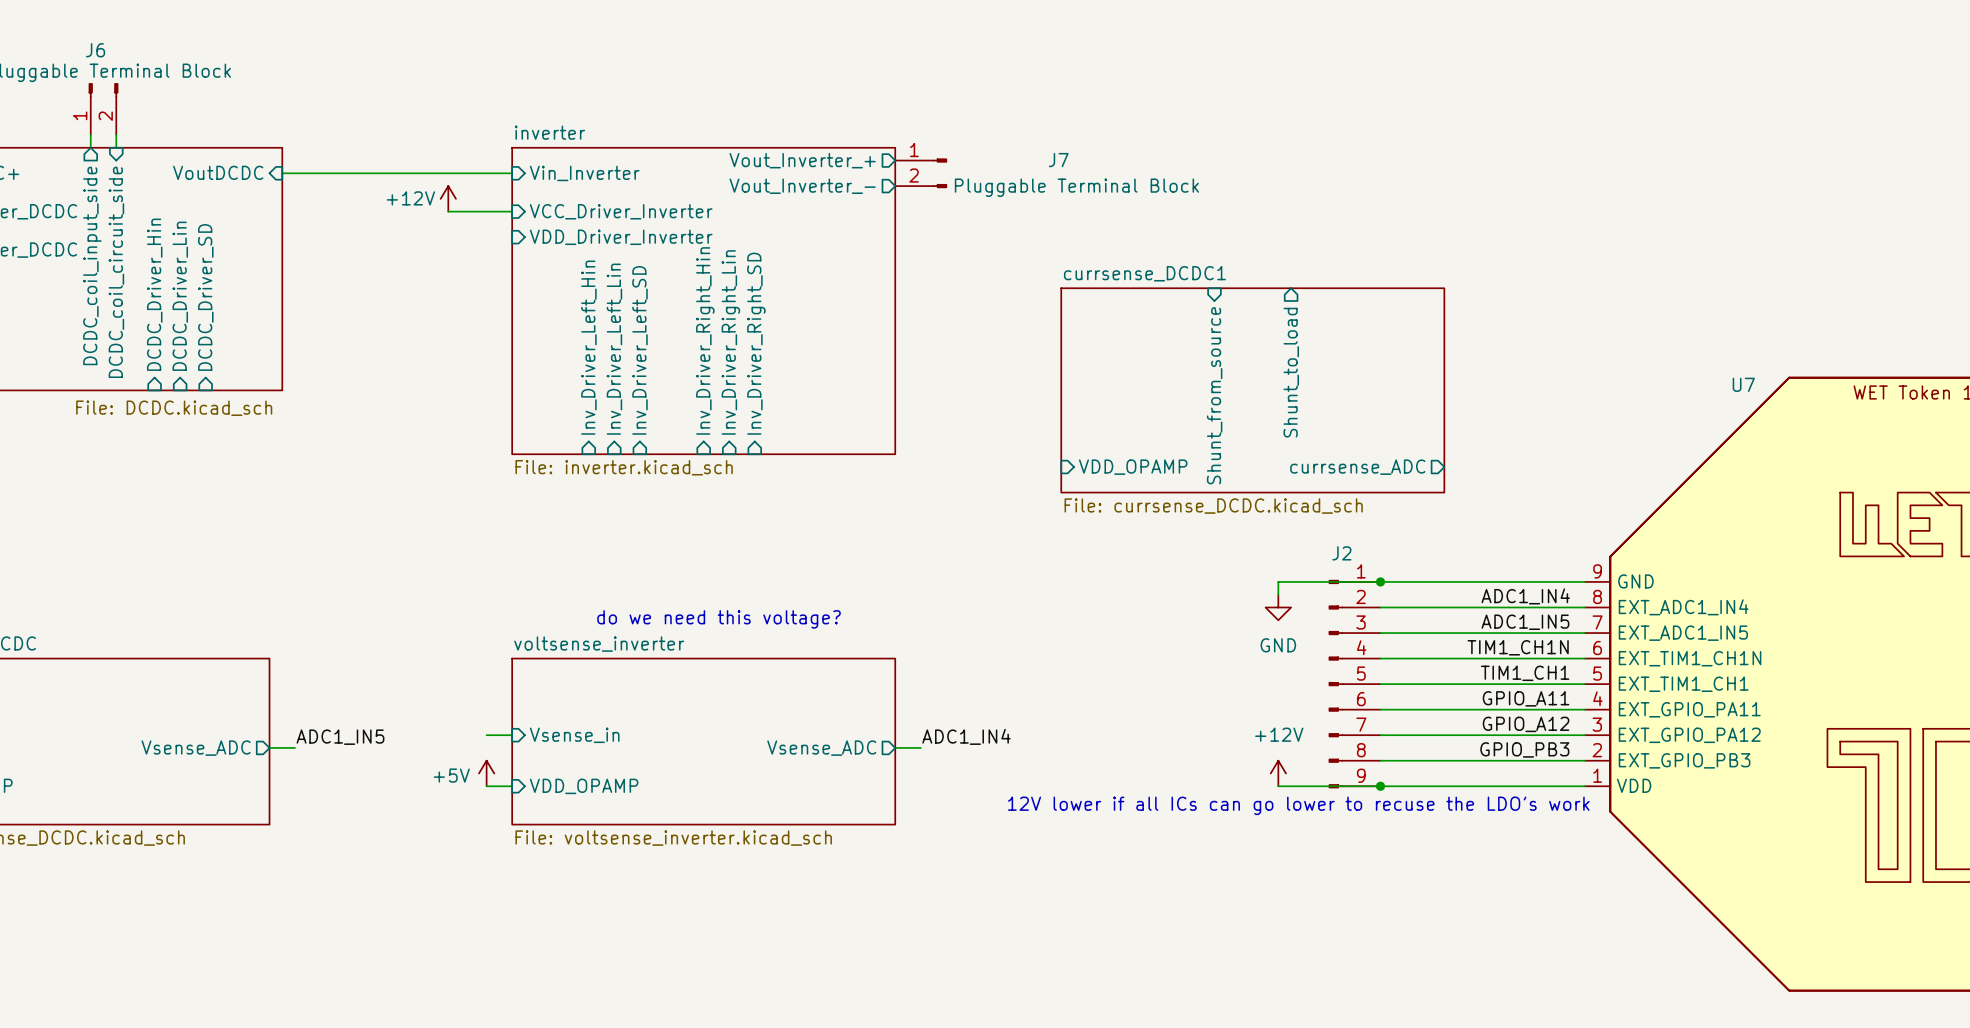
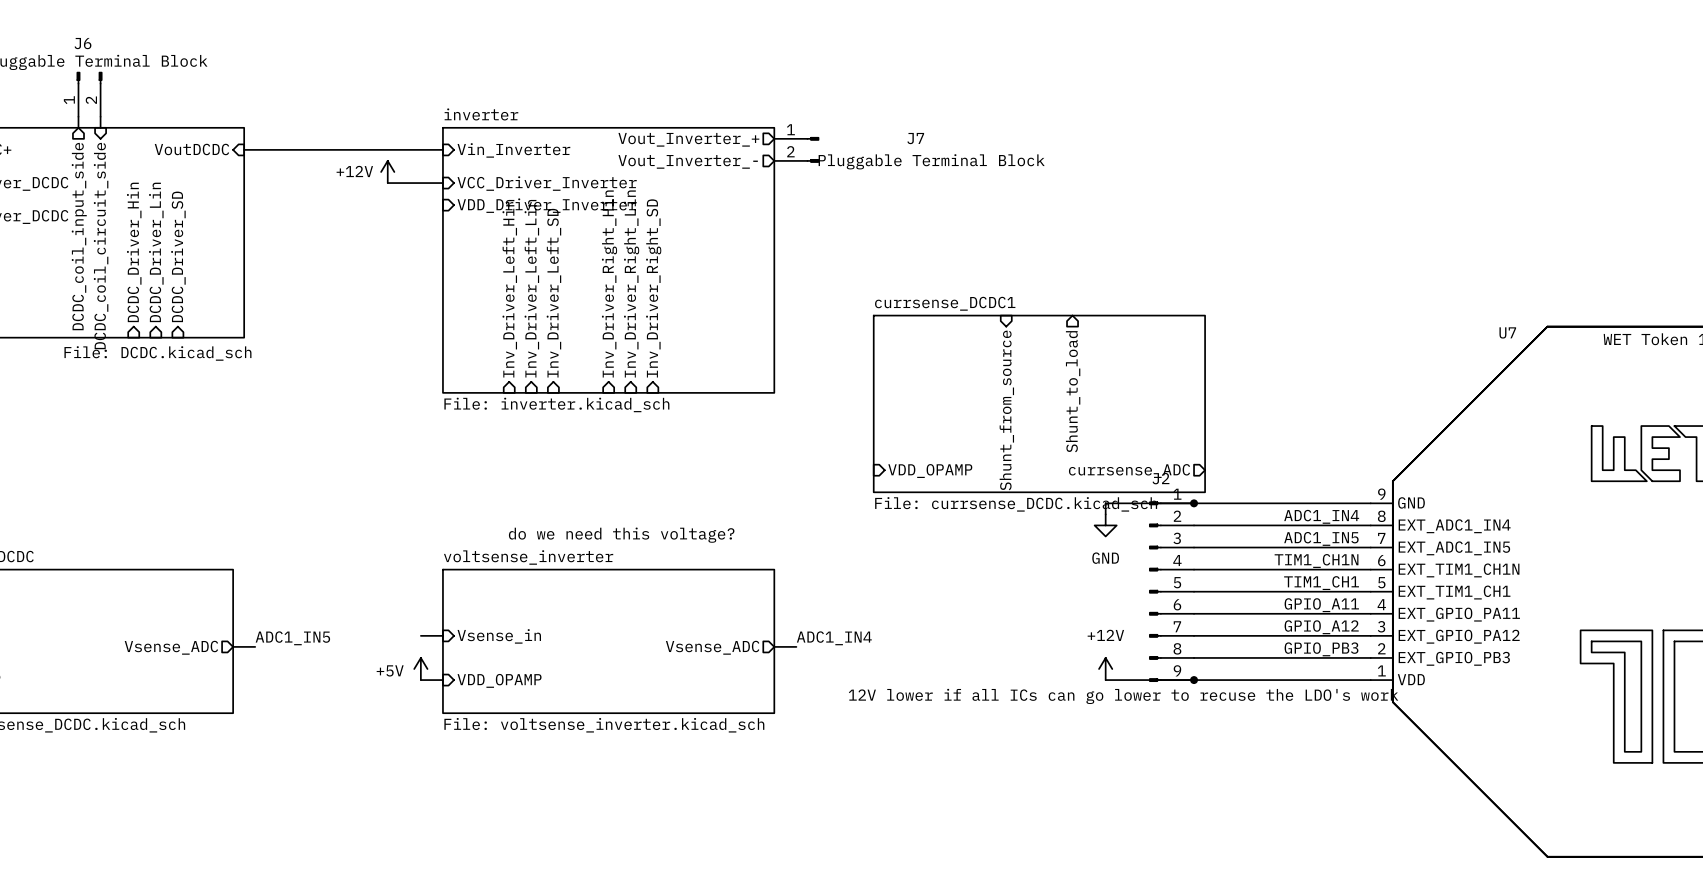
sheet pin position: Shunt_to_load (1291, 372) -> Shunt_to_load (1073, 391)
sheet currsense_DCDC1 position: (1252, 390) -> (1039, 403)
sheet pin position: Shunt_from_source (1214, 395) -> Shunt_from_source (1006, 410)
sheet pin position: VDD_OPAMP (1133, 467) -> VDD_OPAMP (930, 471)
sheet pin position: currsense_ADC (1357, 467) -> currsense_ADC (1129, 471)

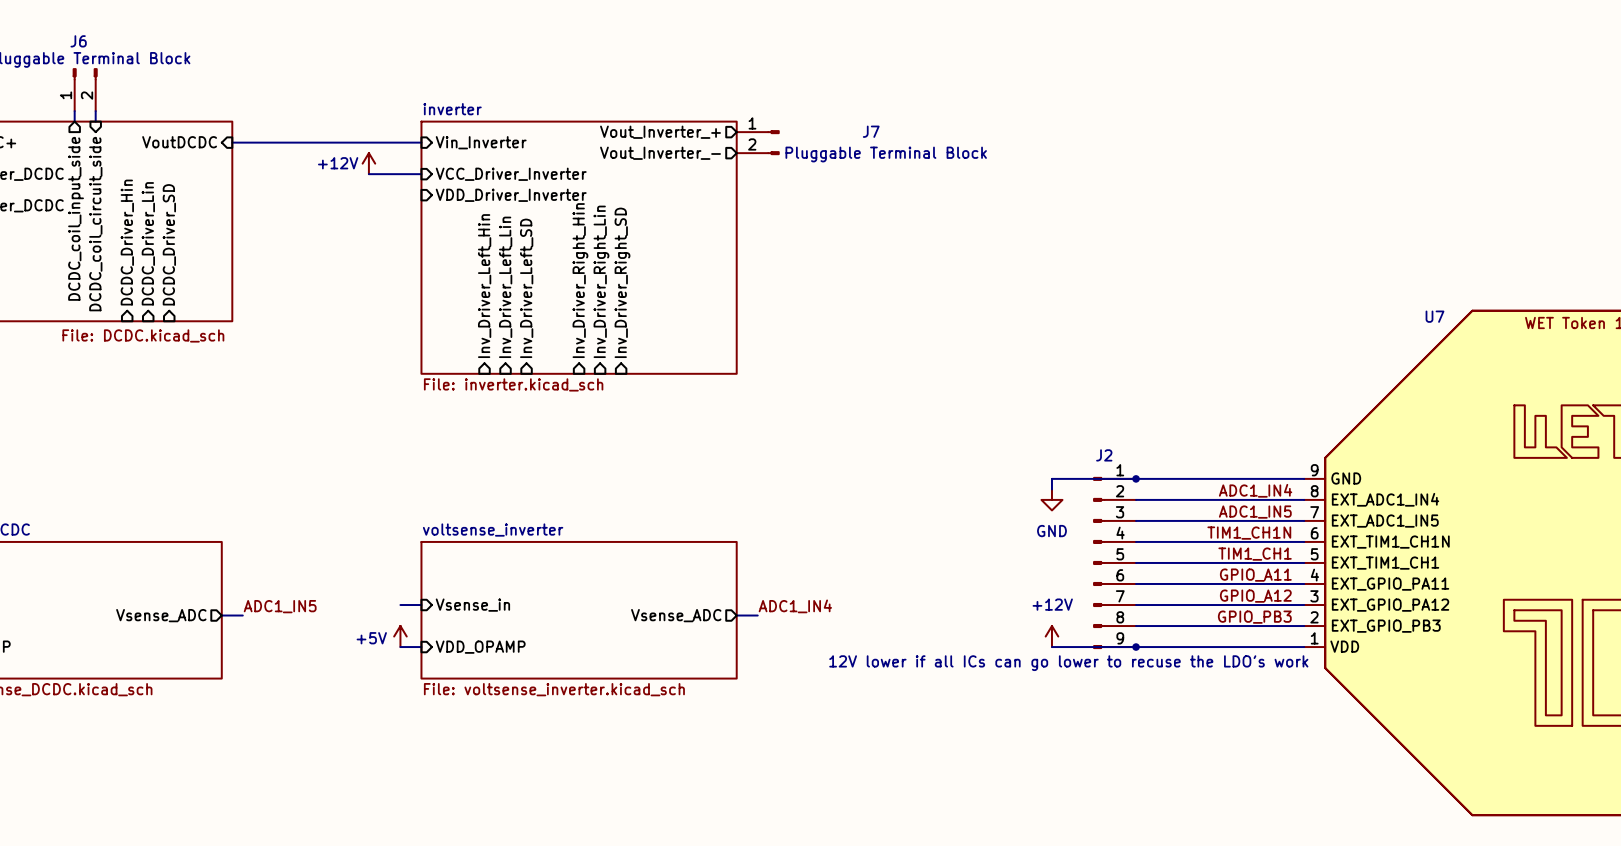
sheet pin: Shunt_to_load (1073, 391) -> none
sheet currsense_DCDC1: File: currsense_DCDC.kicad_sch (1039, 403) -> none
sheet pin: Shunt_from_source (1006, 410) -> none
sheet pin: VDD_OPAMP (930, 471) -> none
sheet pin: currsense_ADC (1129, 471) -> none
text: do we need this voltage? (621, 535) -> none

